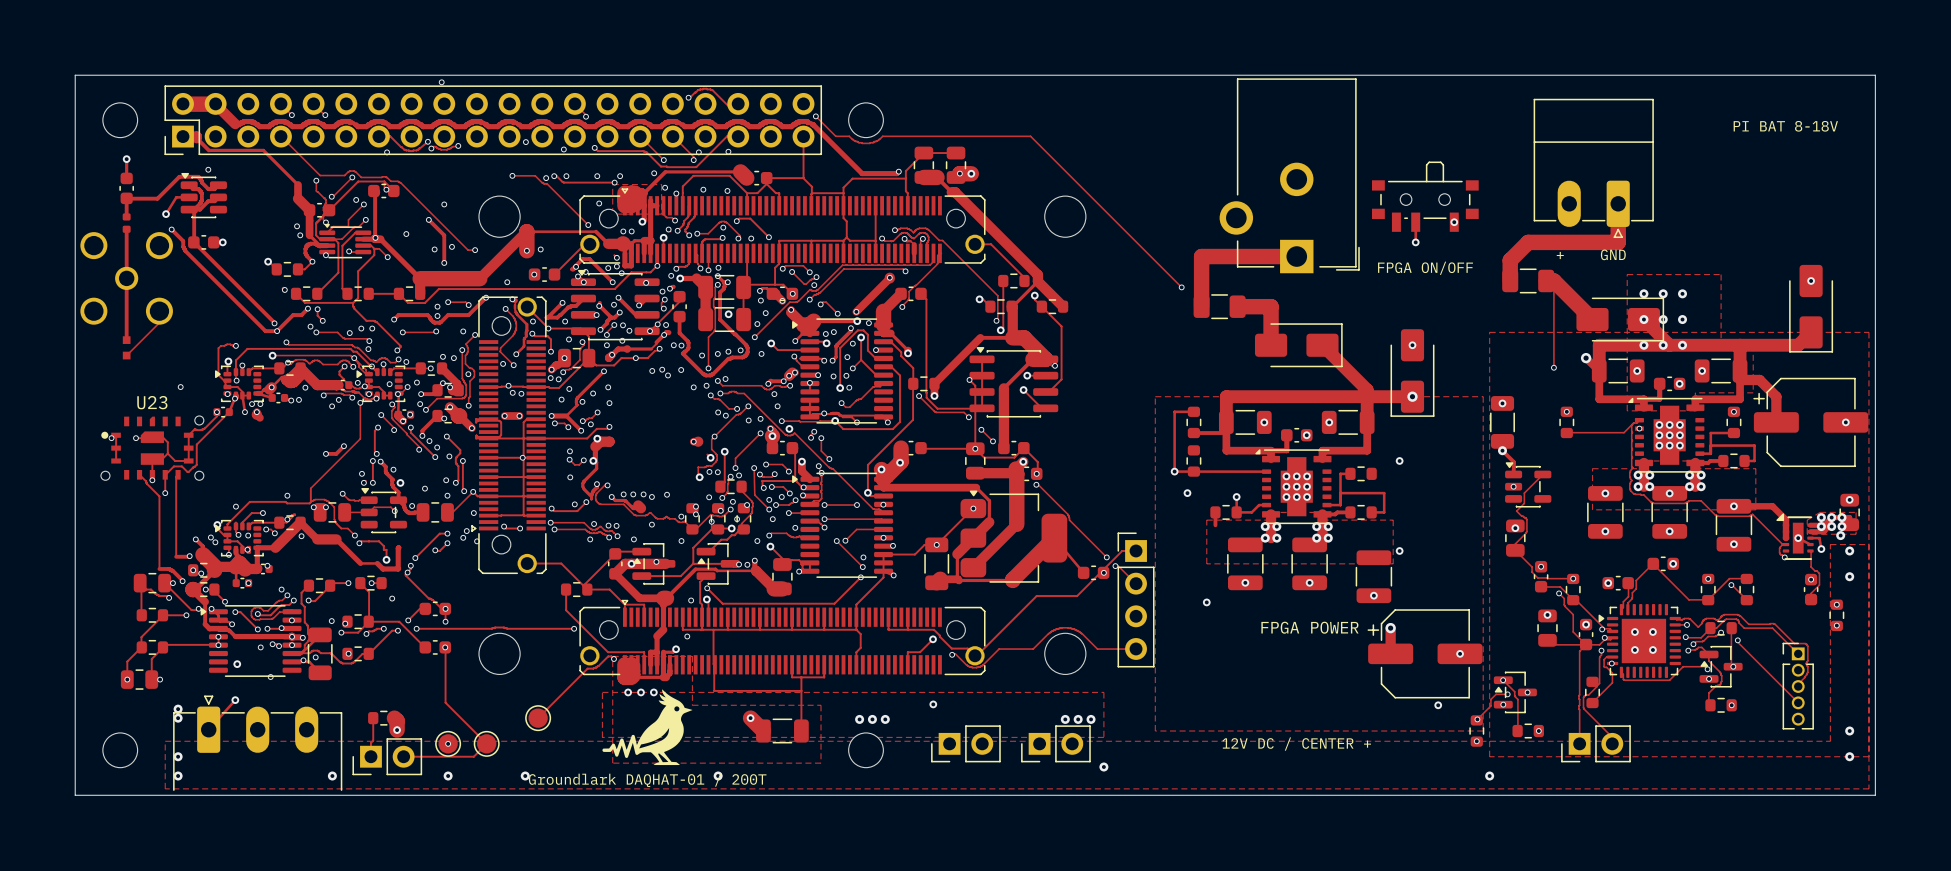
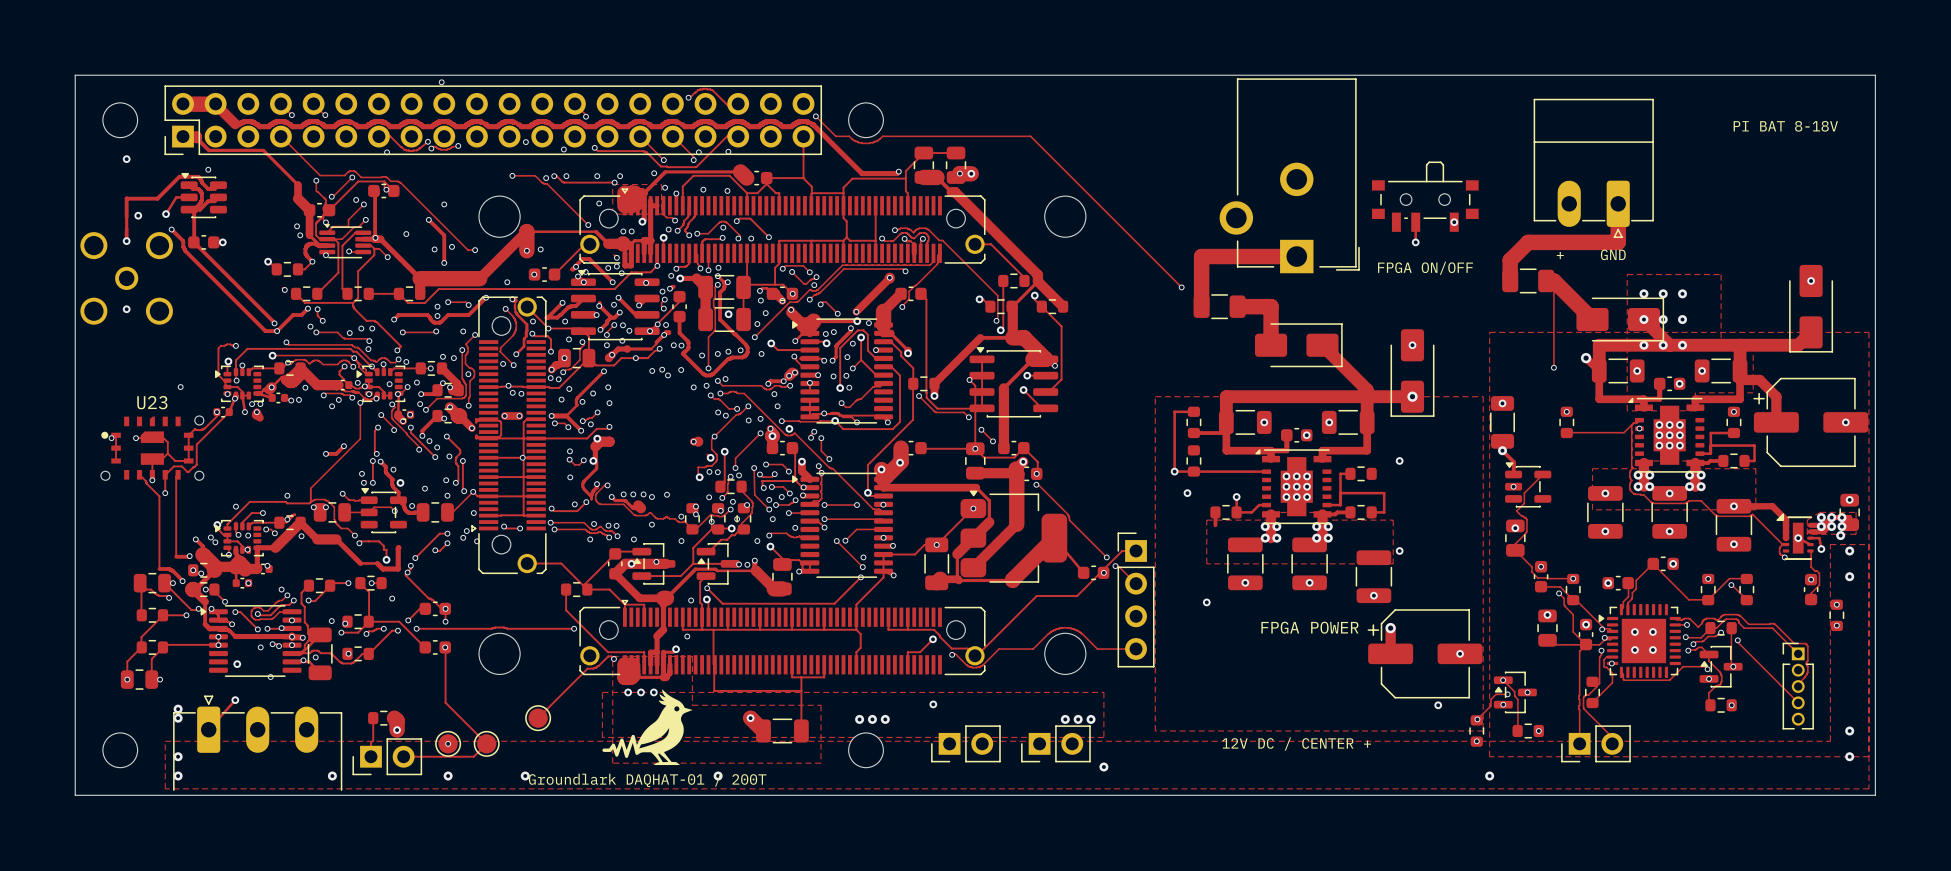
track: (126, 159) (126, 178) -> none
part: (126, 188) -> none
via: none -> (138, 215)
track: none -> (126, 216) (126, 229)
part: (126, 223) -> none
track: (126, 241) (126, 340) -> none
via: none -> (126, 241)
via: none -> (126, 309)
track: (159, 322) (126, 355) -> none
part: (126, 347) -> none

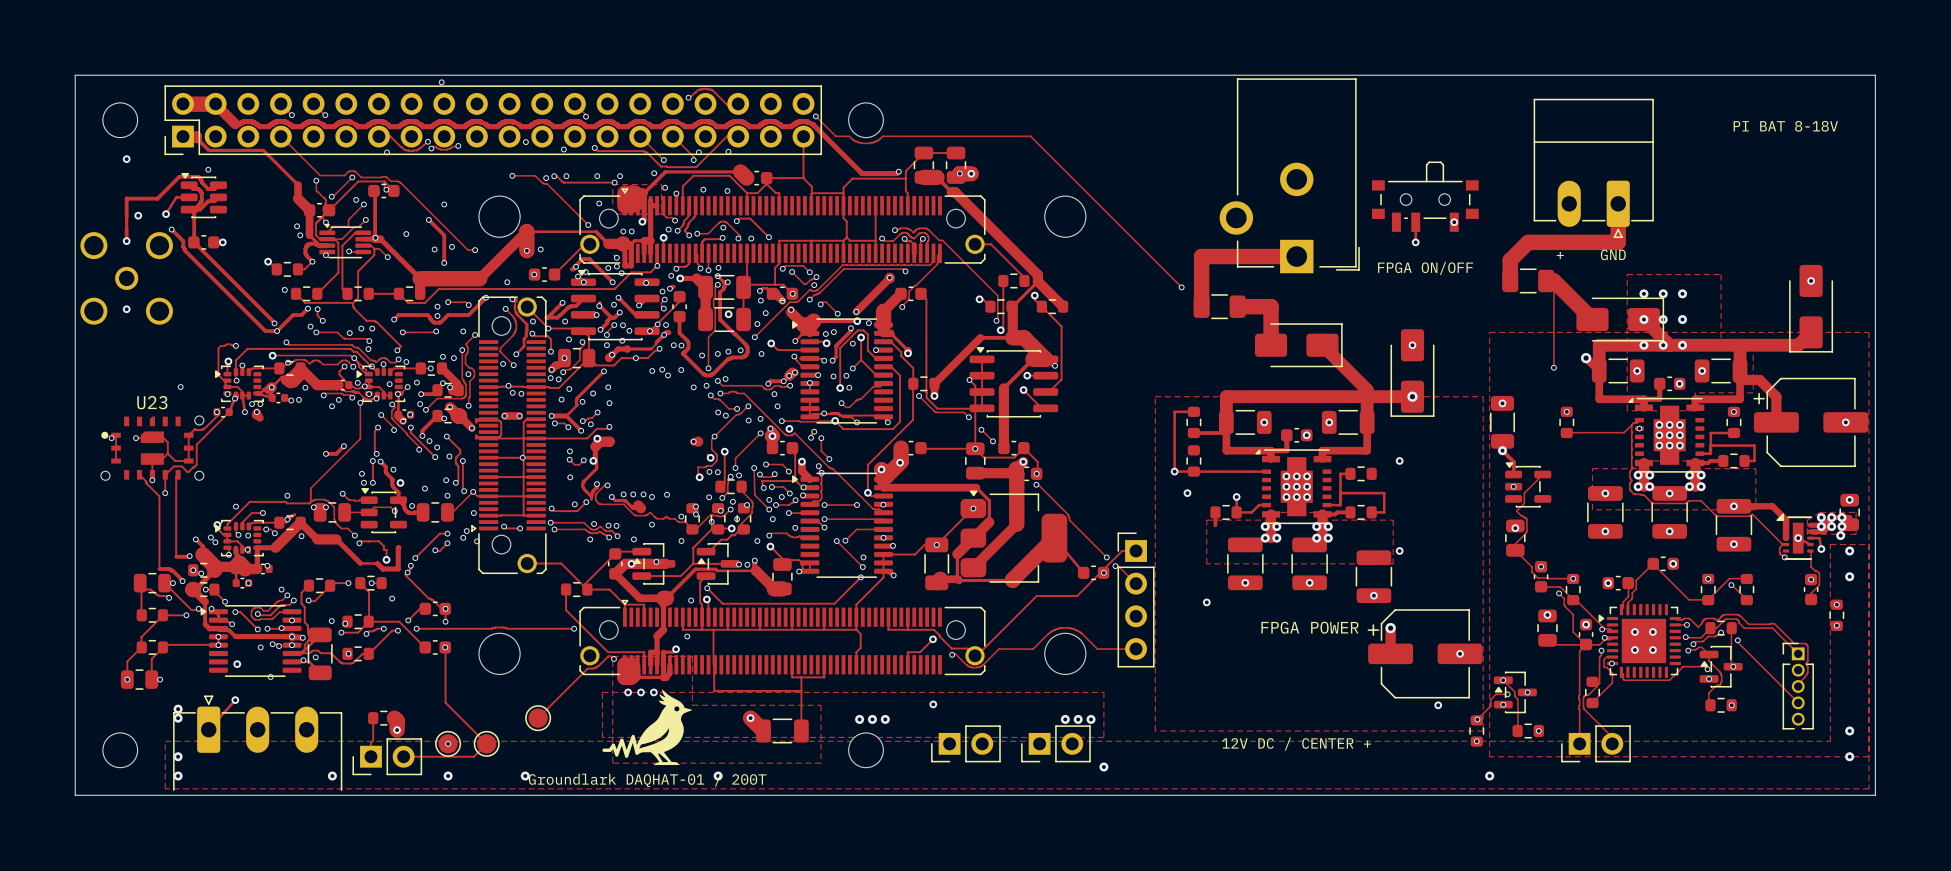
via: (847, 357) -> none

